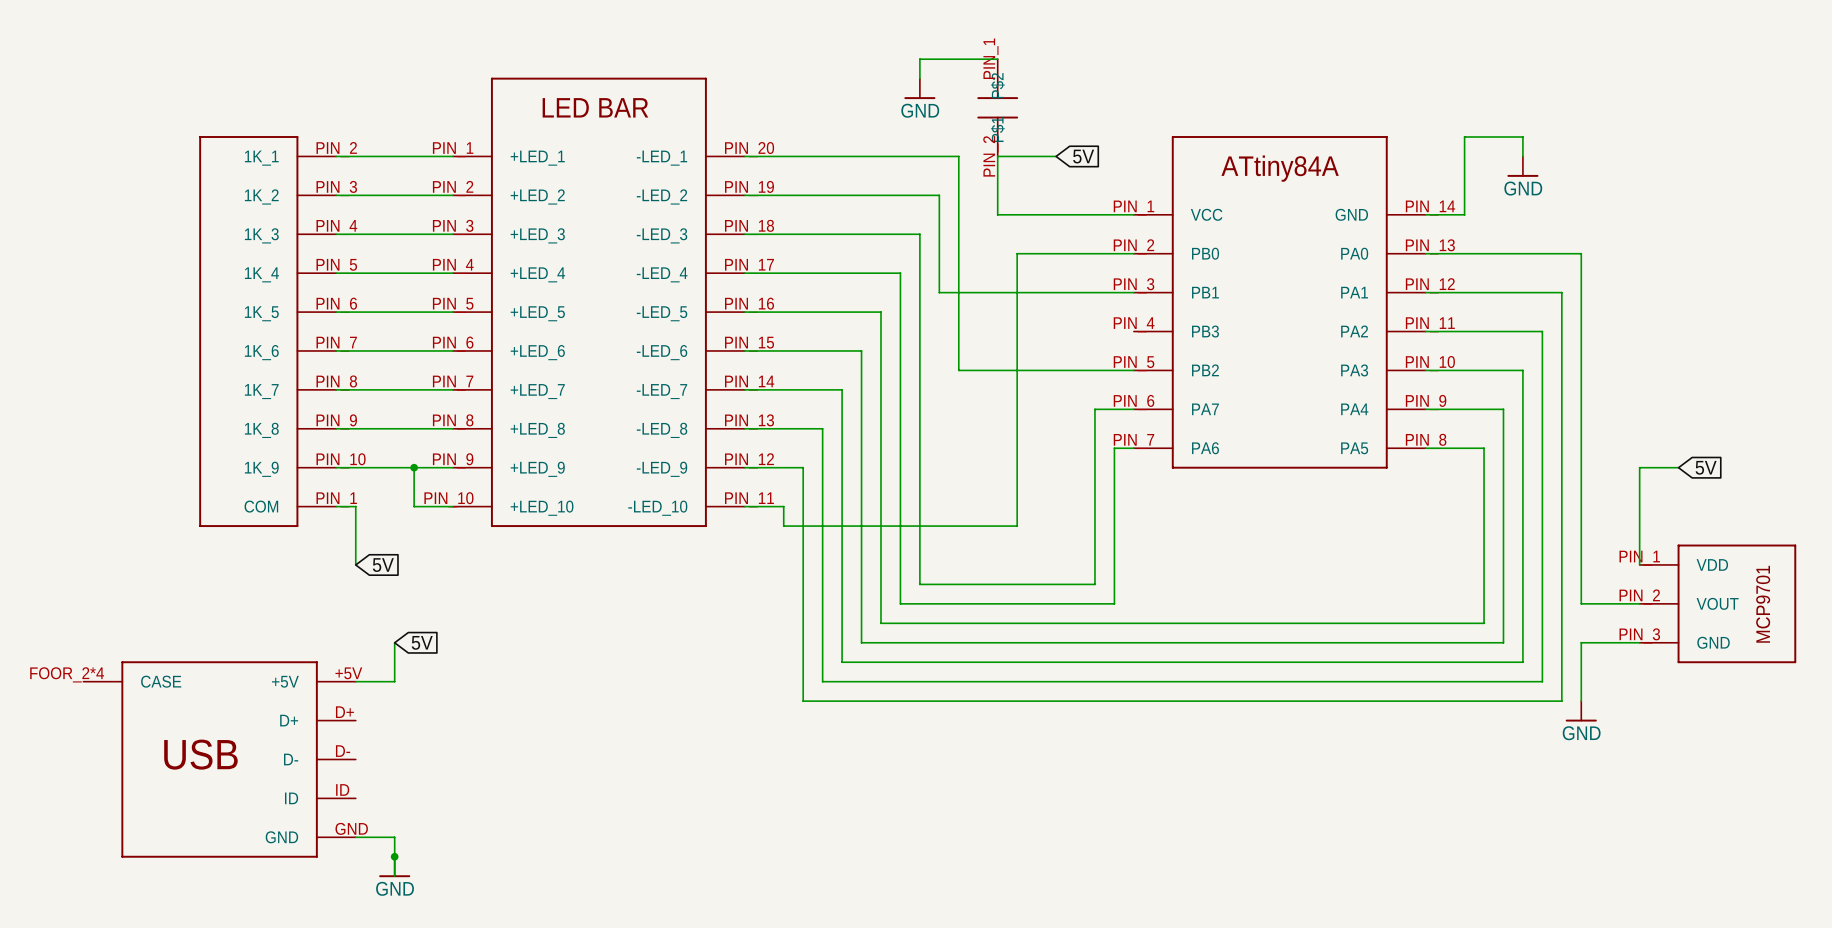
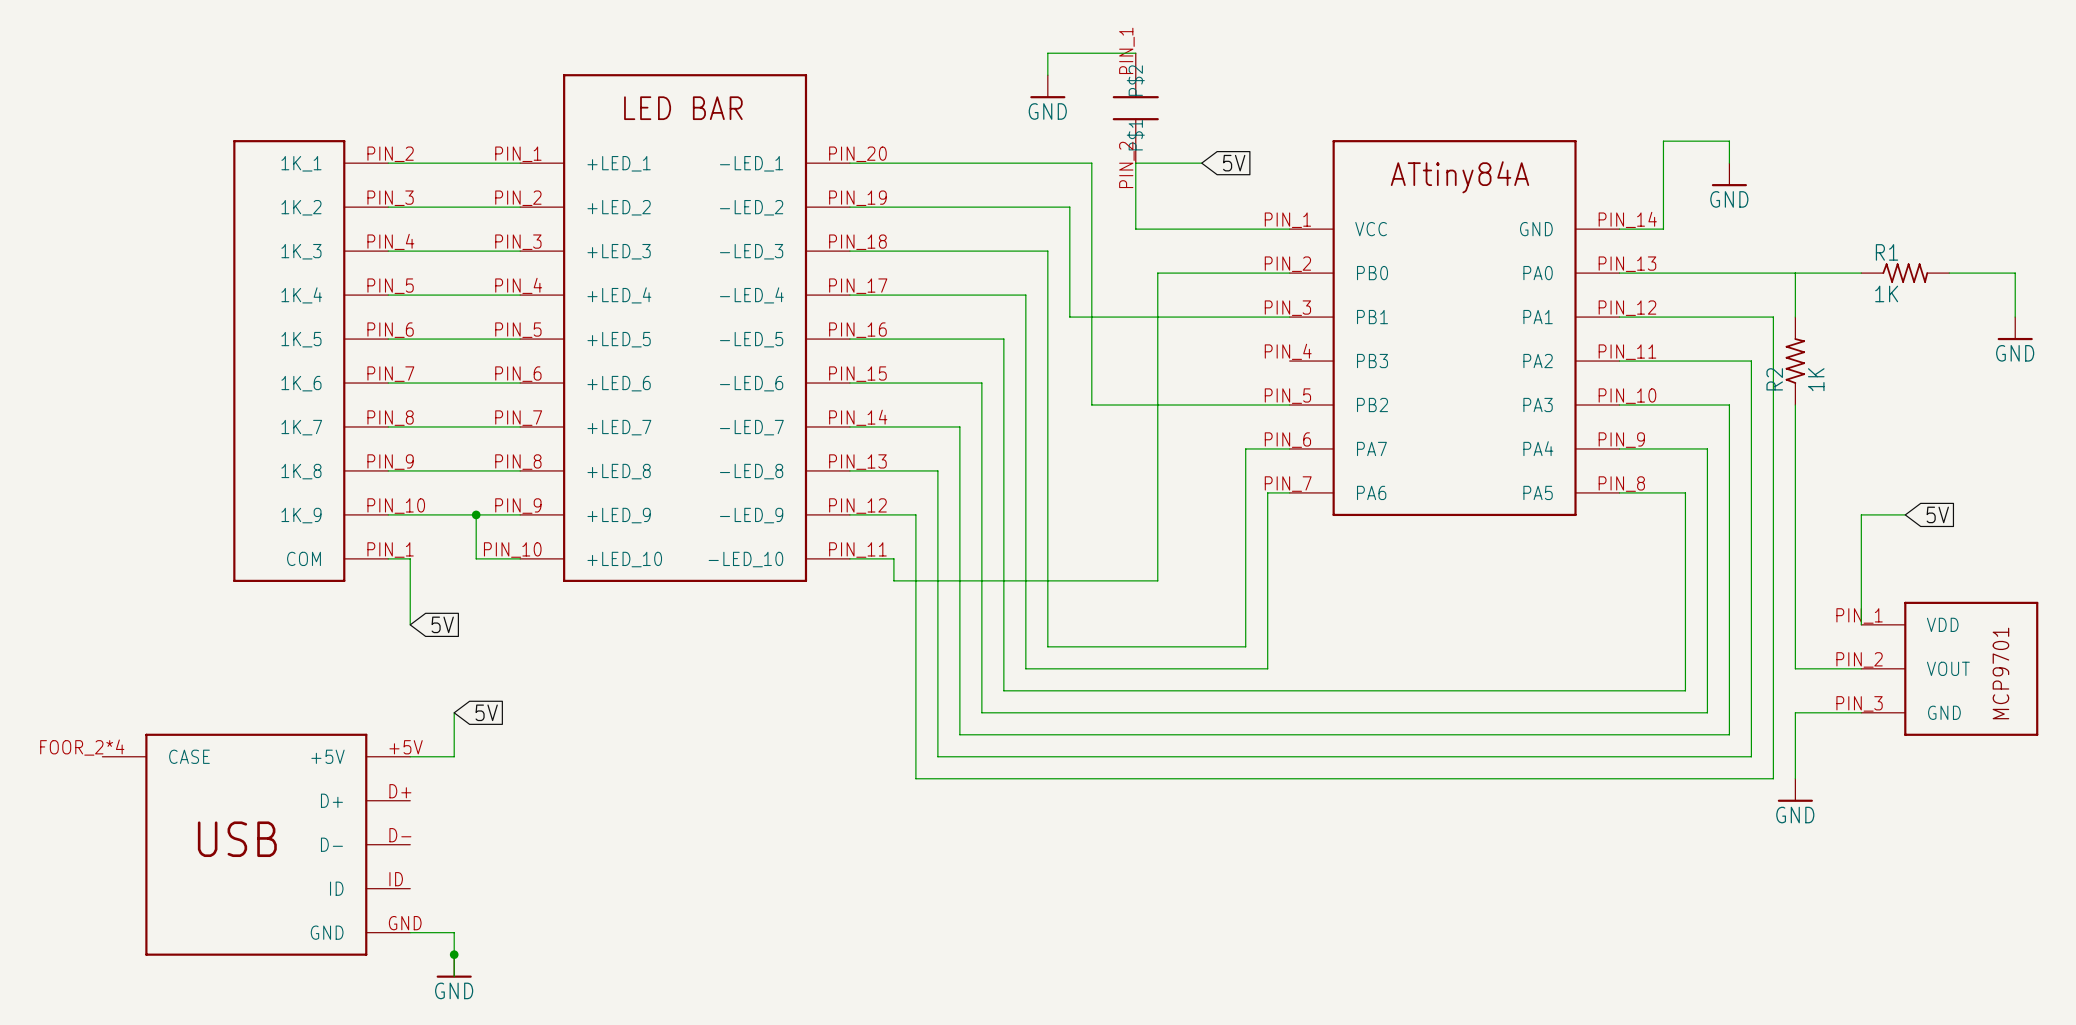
wire: none -> (1795, 273) (1861, 273)
R1: none -> 1K (1905, 273)
wire: none -> (1949, 273) (2015, 273) (2015, 317)
power symbol: none -> GND (2015, 328)
R2: none -> 1K (1795, 361)

